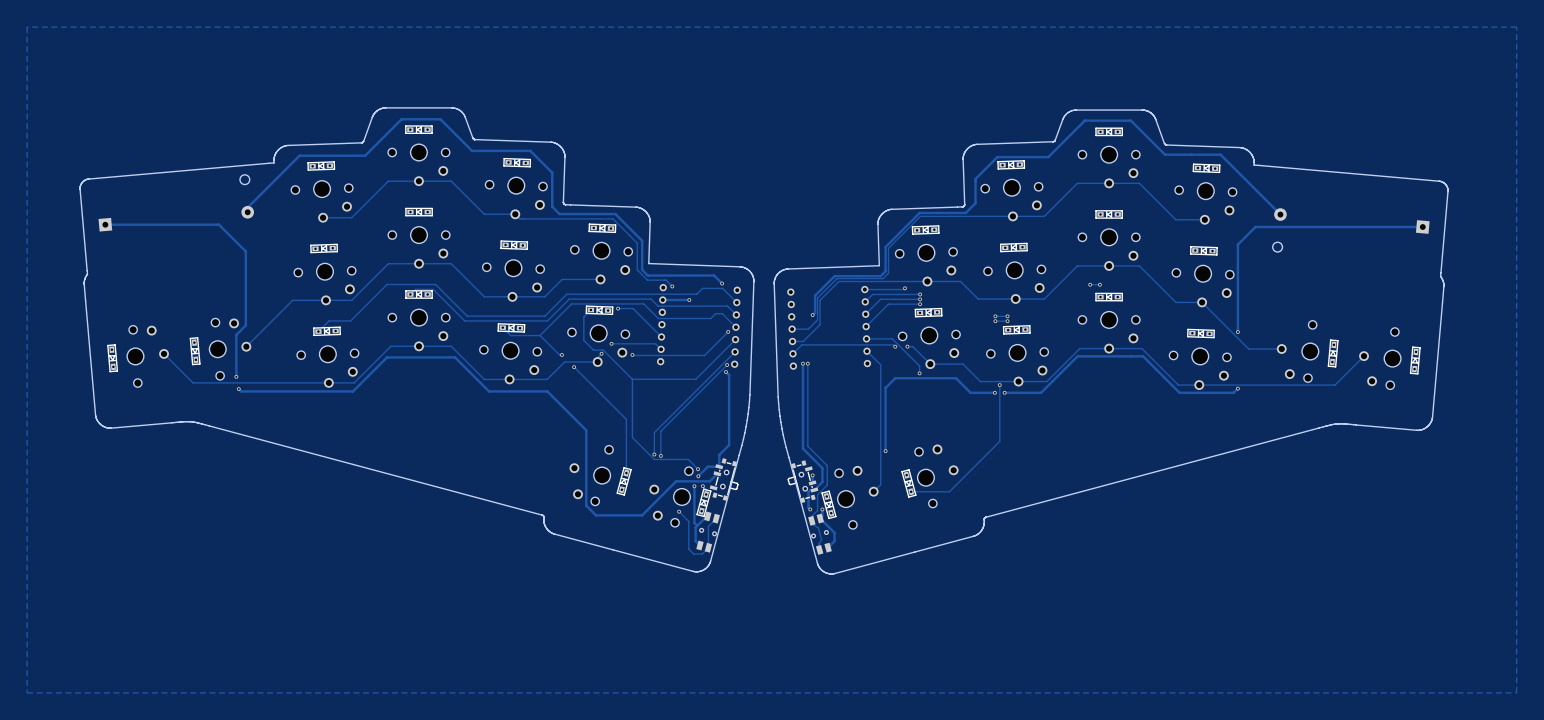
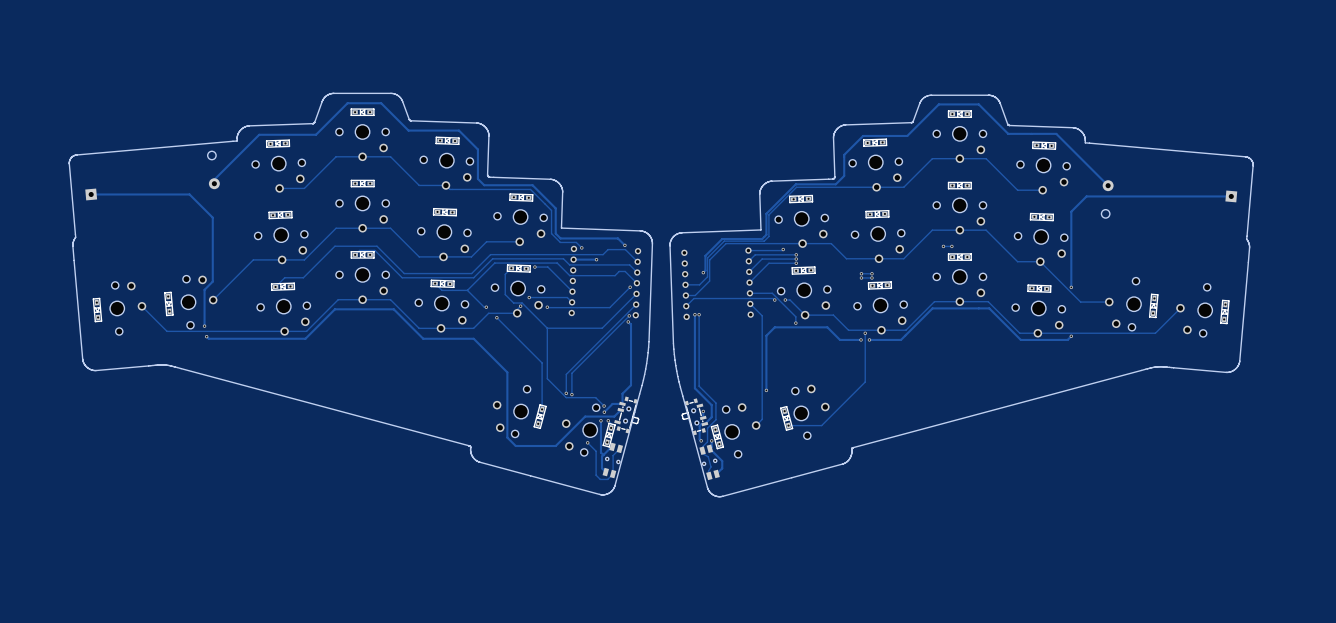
zone outline: (1516, 27) (27, 27) (27, 692) (1516, 692) (1516, 27) -> none

